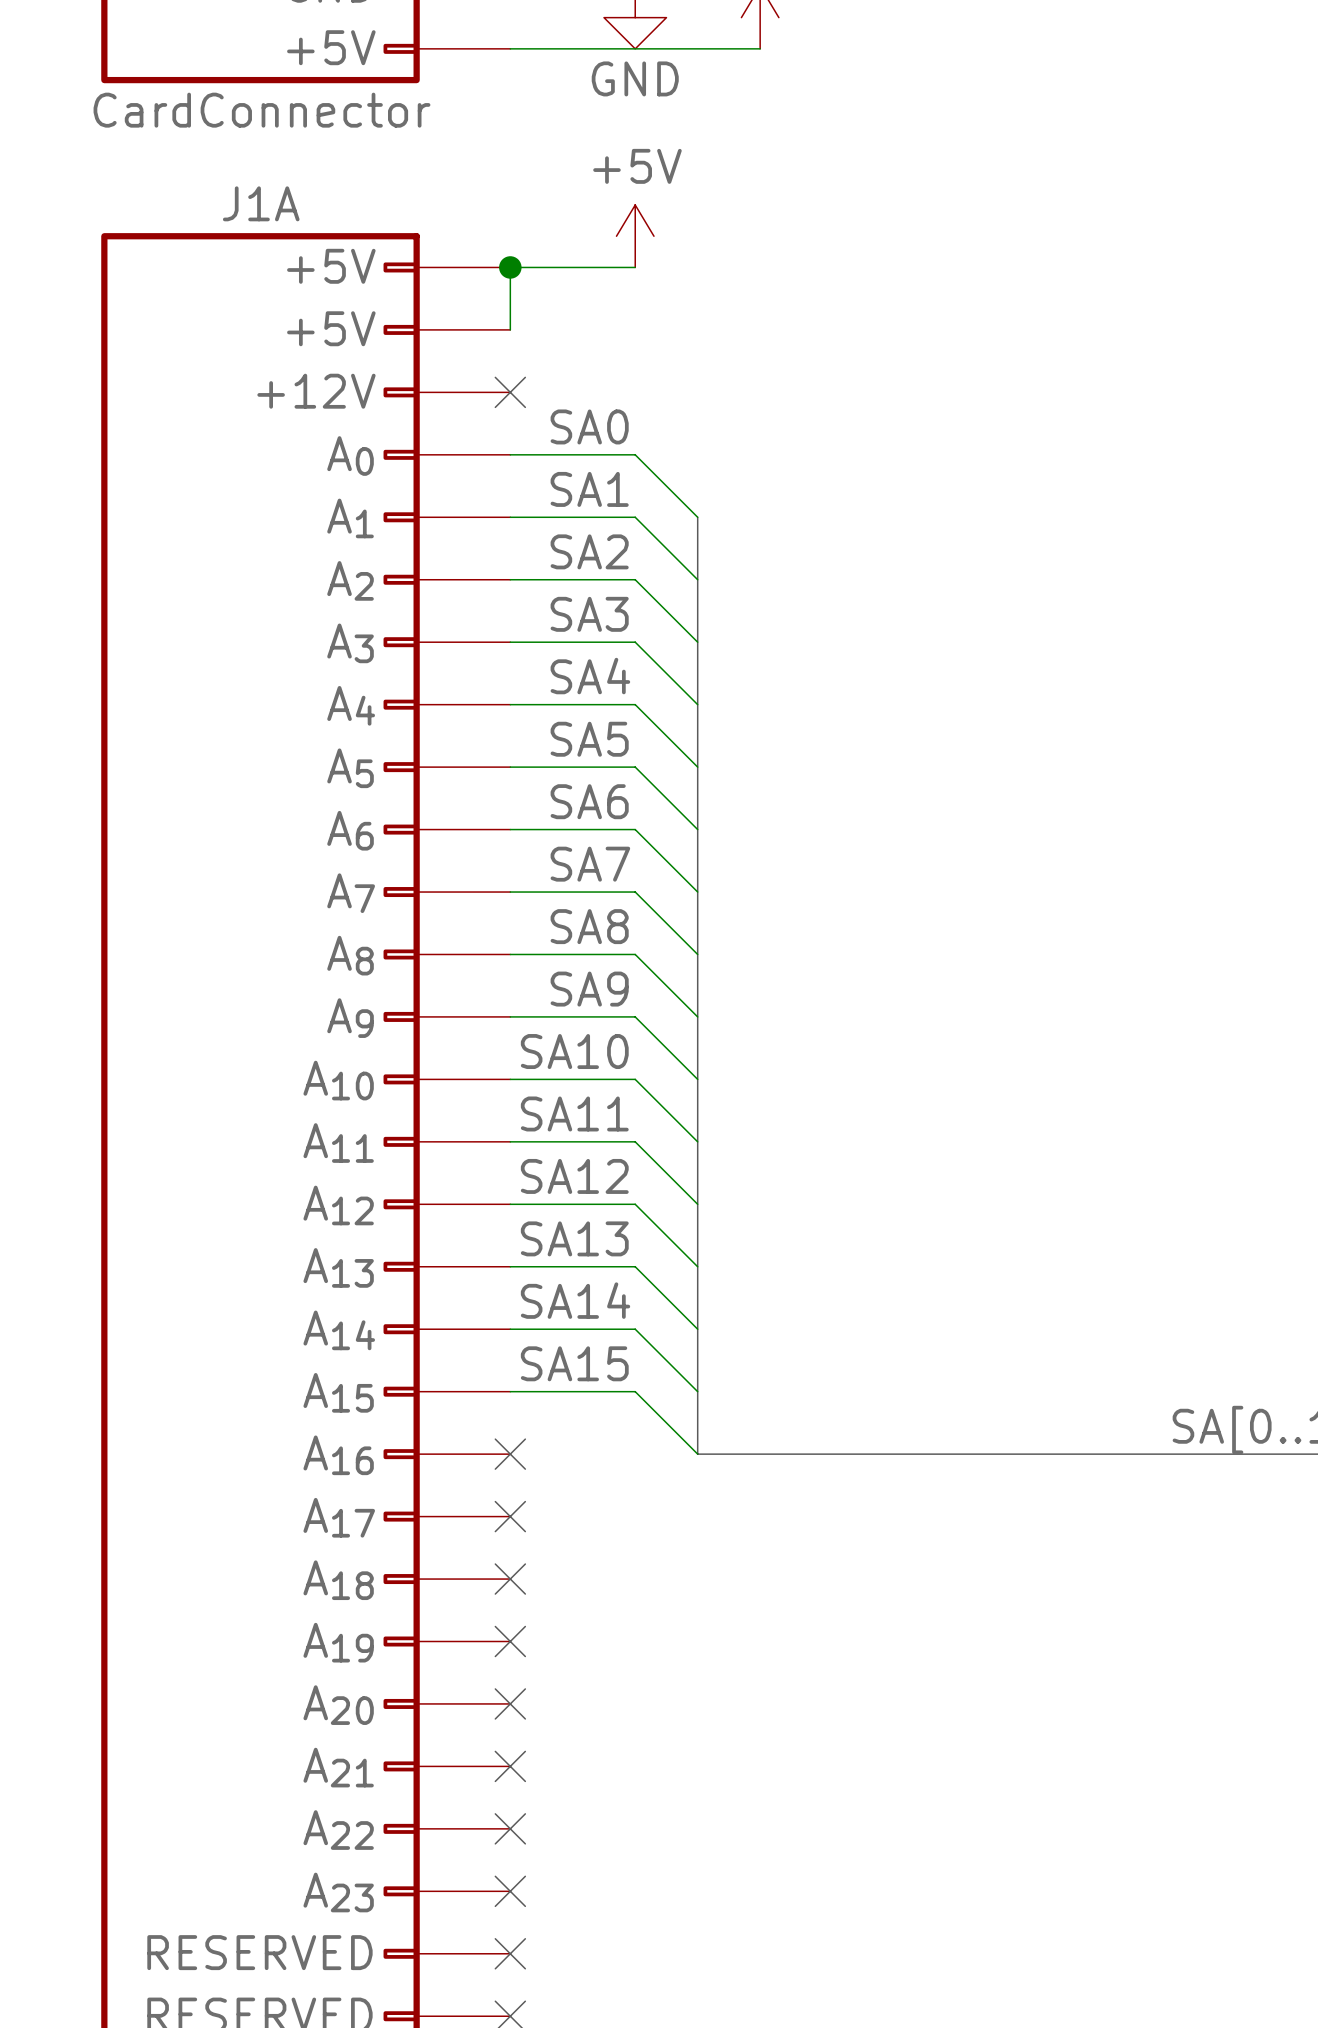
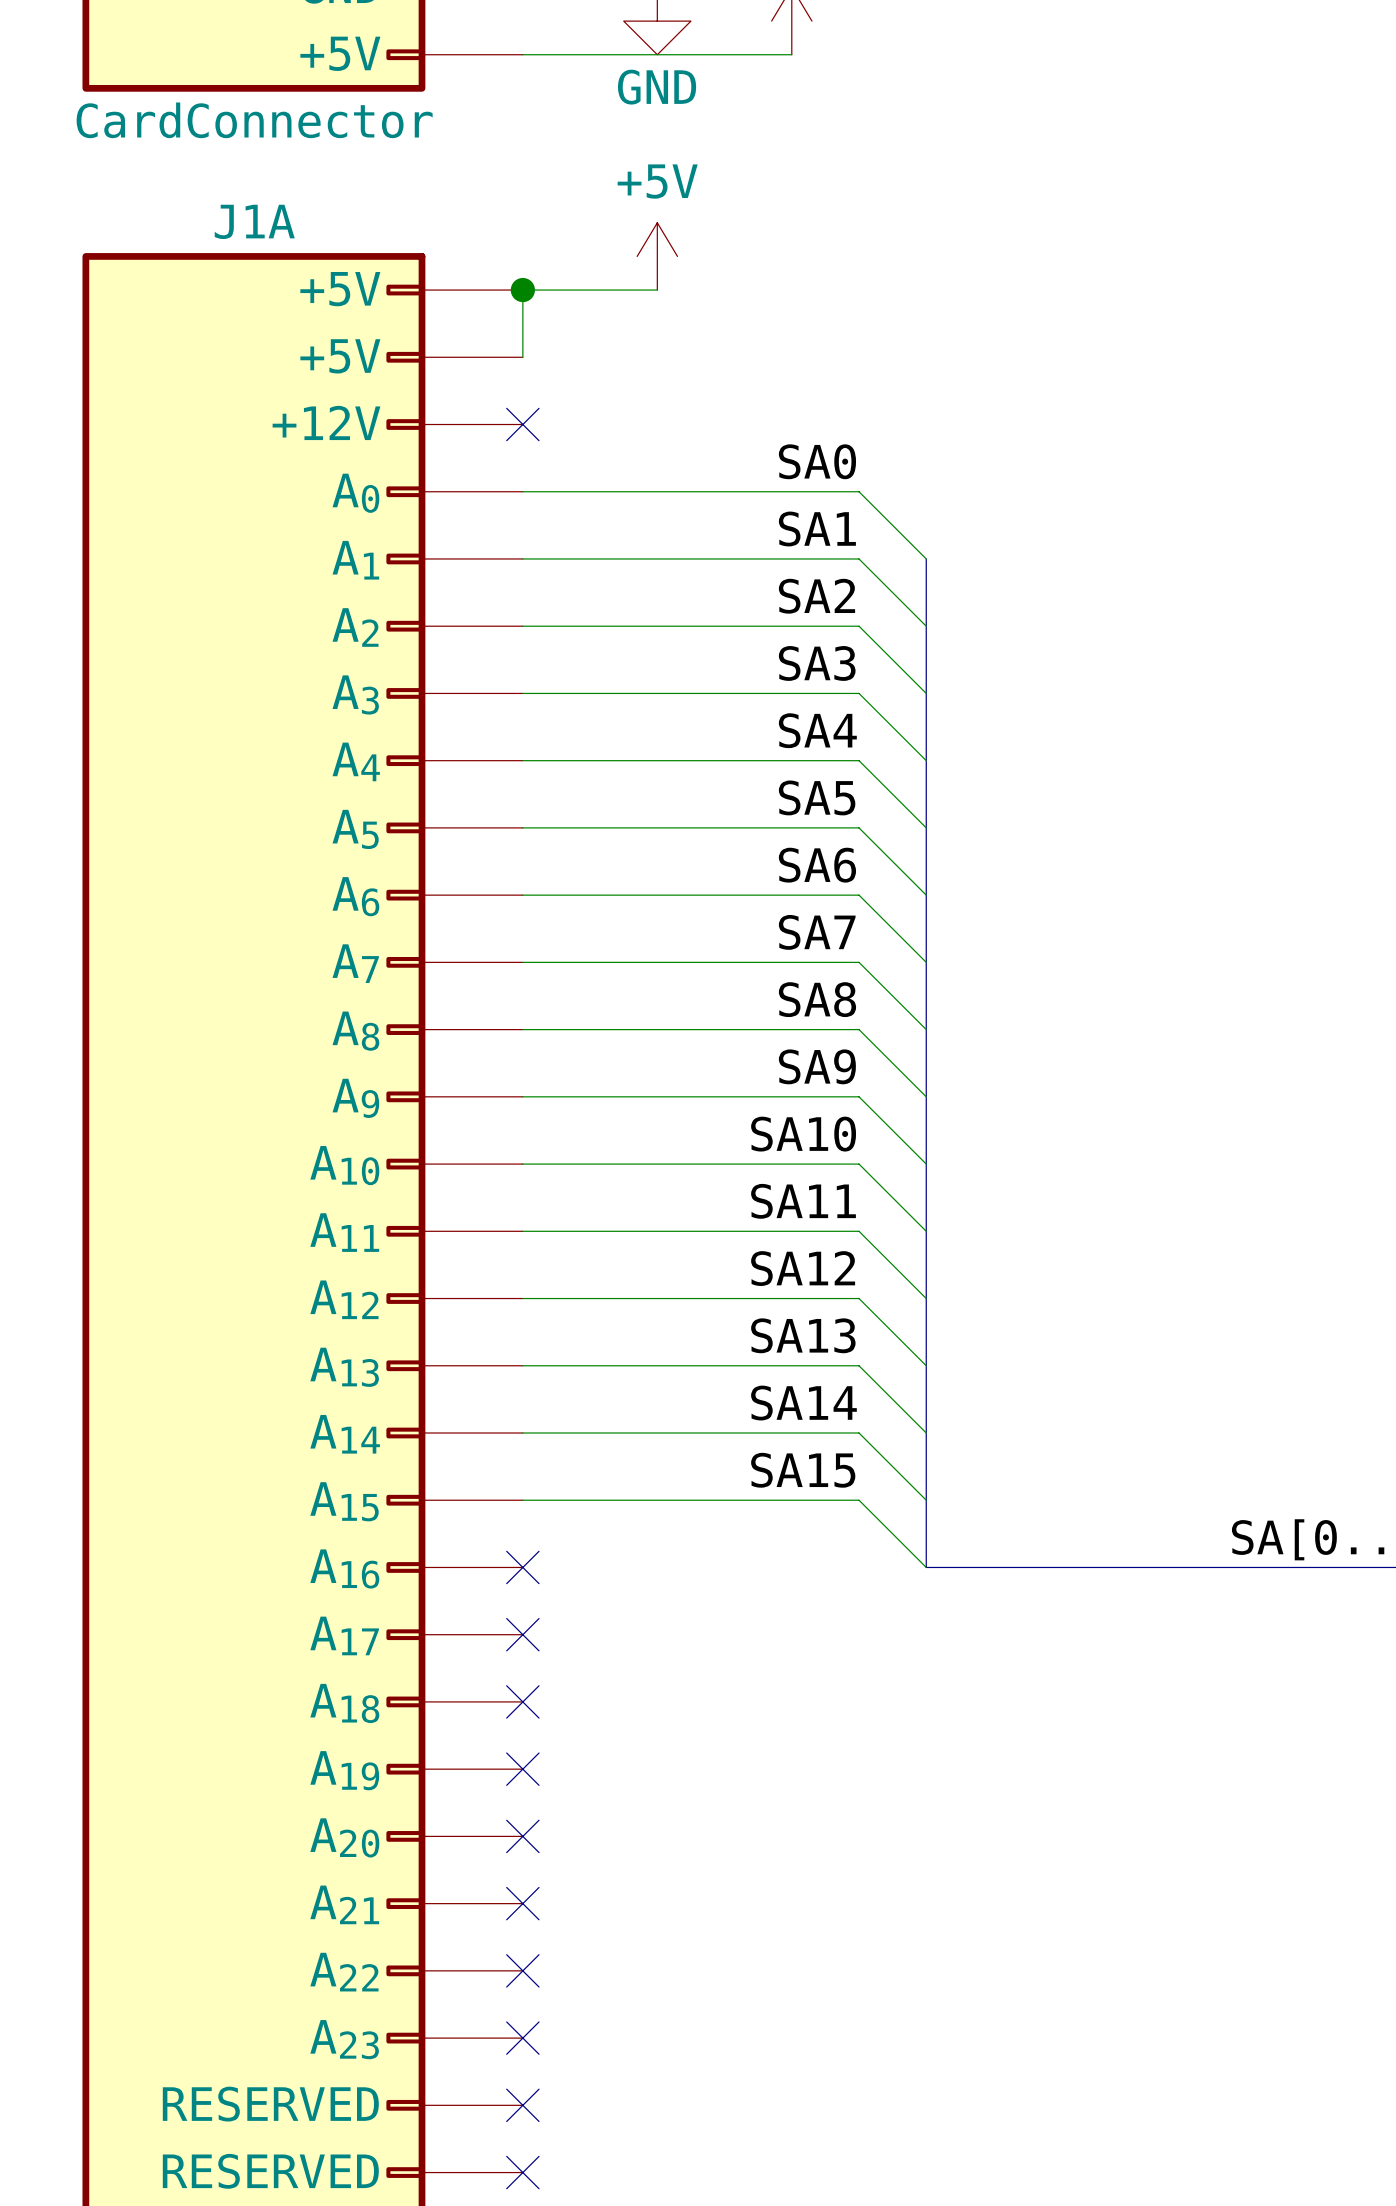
label position: SA0 (589, 426) -> SA0 (817, 461)
wire: (635, 454) (697, 517) -> (657, 491) (859, 491) (926, 558)
label position: SA1 (589, 489) -> SA1 (817, 529)
wire: (635, 517) (697, 579) -> (657, 558) (859, 558) (926, 626)
bus: (697, 517) (697, 1454) (885, 1454) -> (926, 558) (926, 1567)
label position: SA2 (589, 551) -> SA2 (816, 596)
wire: (635, 579) (697, 642) -> (657, 626) (859, 626) (926, 693)
label position: SA3 (589, 614) -> SA3 (817, 663)
wire: (635, 642) (697, 704) -> (657, 693) (859, 693) (926, 760)
label position: SA4 (590, 676) -> SA4 (817, 730)
wire: (635, 704) (697, 767) -> (657, 760) (859, 760) (926, 827)
label position: SA5 (589, 739) -> SA5 (817, 797)
wire: (635, 767) (697, 829) -> (657, 827) (859, 827) (926, 895)
label position: SA6 (589, 801) -> SA6 (817, 865)
wire: (635, 829) (697, 892) -> (657, 895) (859, 895) (926, 962)
label position: SA7 (590, 864) -> SA7 (817, 932)
wire: (635, 892) (697, 954) -> (657, 962) (859, 962) (926, 1029)
label position: SA8 (589, 926) -> SA8 (817, 999)
wire: (635, 954) (697, 1016) -> (657, 1029) (859, 1029) (926, 1096)
label position: SA9 (589, 989) -> SA9 (817, 1066)
wire: (635, 1016) (697, 1079) -> (657, 1096) (859, 1096) (926, 1164)
label position: SA10 (574, 1051) -> SA10 (803, 1134)
wire: (635, 1079) (697, 1141) -> (657, 1164) (859, 1164) (926, 1231)
label position: SA11 (574, 1113) -> SA11 (803, 1201)
wire: (635, 1141) (697, 1204) -> (657, 1231) (859, 1231) (926, 1298)
label position: SA12 (574, 1176) -> SA12 (803, 1268)
wire: (635, 1204) (697, 1266) -> (657, 1298) (859, 1298) (926, 1365)
label position: SA13 (574, 1238) -> SA13 (803, 1335)
wire: (635, 1266) (697, 1329) -> (657, 1365) (859, 1365) (926, 1433)
label position: SA14 (575, 1300) -> SA14 (803, 1403)
wire: (635, 1329) (697, 1391) -> (657, 1433) (859, 1433) (926, 1500)
label position: SA15 (574, 1363) -> SA15 (803, 1470)
wire: (635, 1391) (697, 1454) -> (657, 1500) (859, 1500) (926, 1567)

